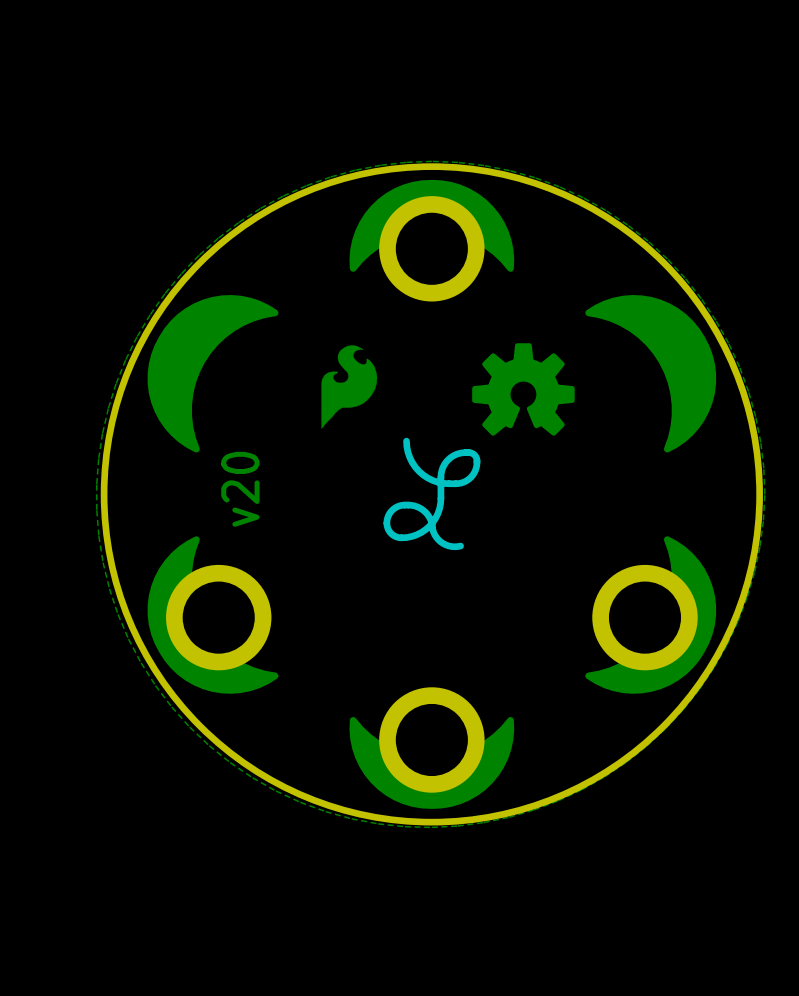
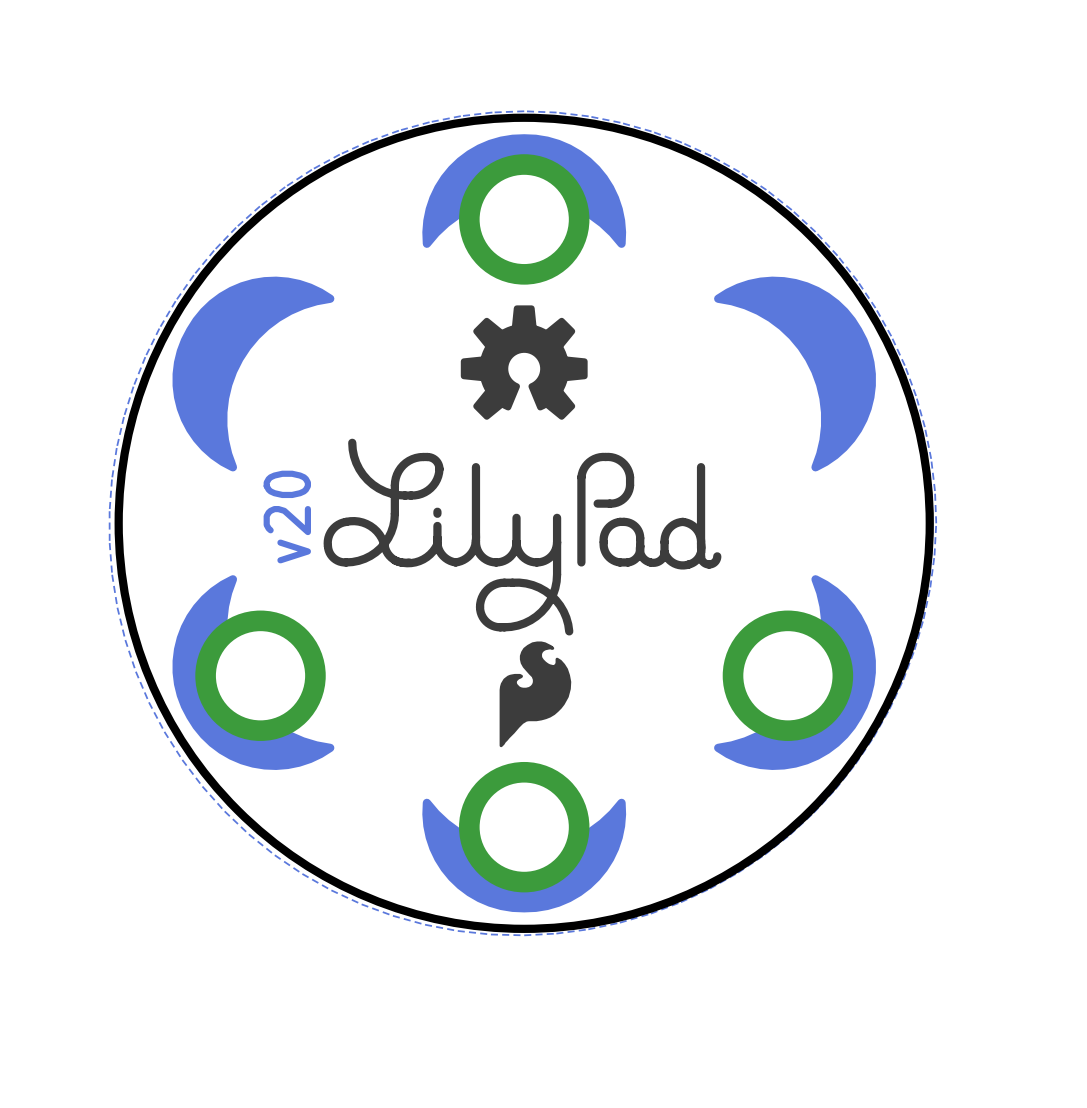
drawing: none -> [460, 305, 588, 420]
drawing: [472, 343, 575, 436] -> none
drawing: [321, 345, 378, 429] -> none
drawing shape: [383, 437, 481, 551] -> [323, 438, 722, 636]
drawing: none -> [499, 641, 572, 748]

